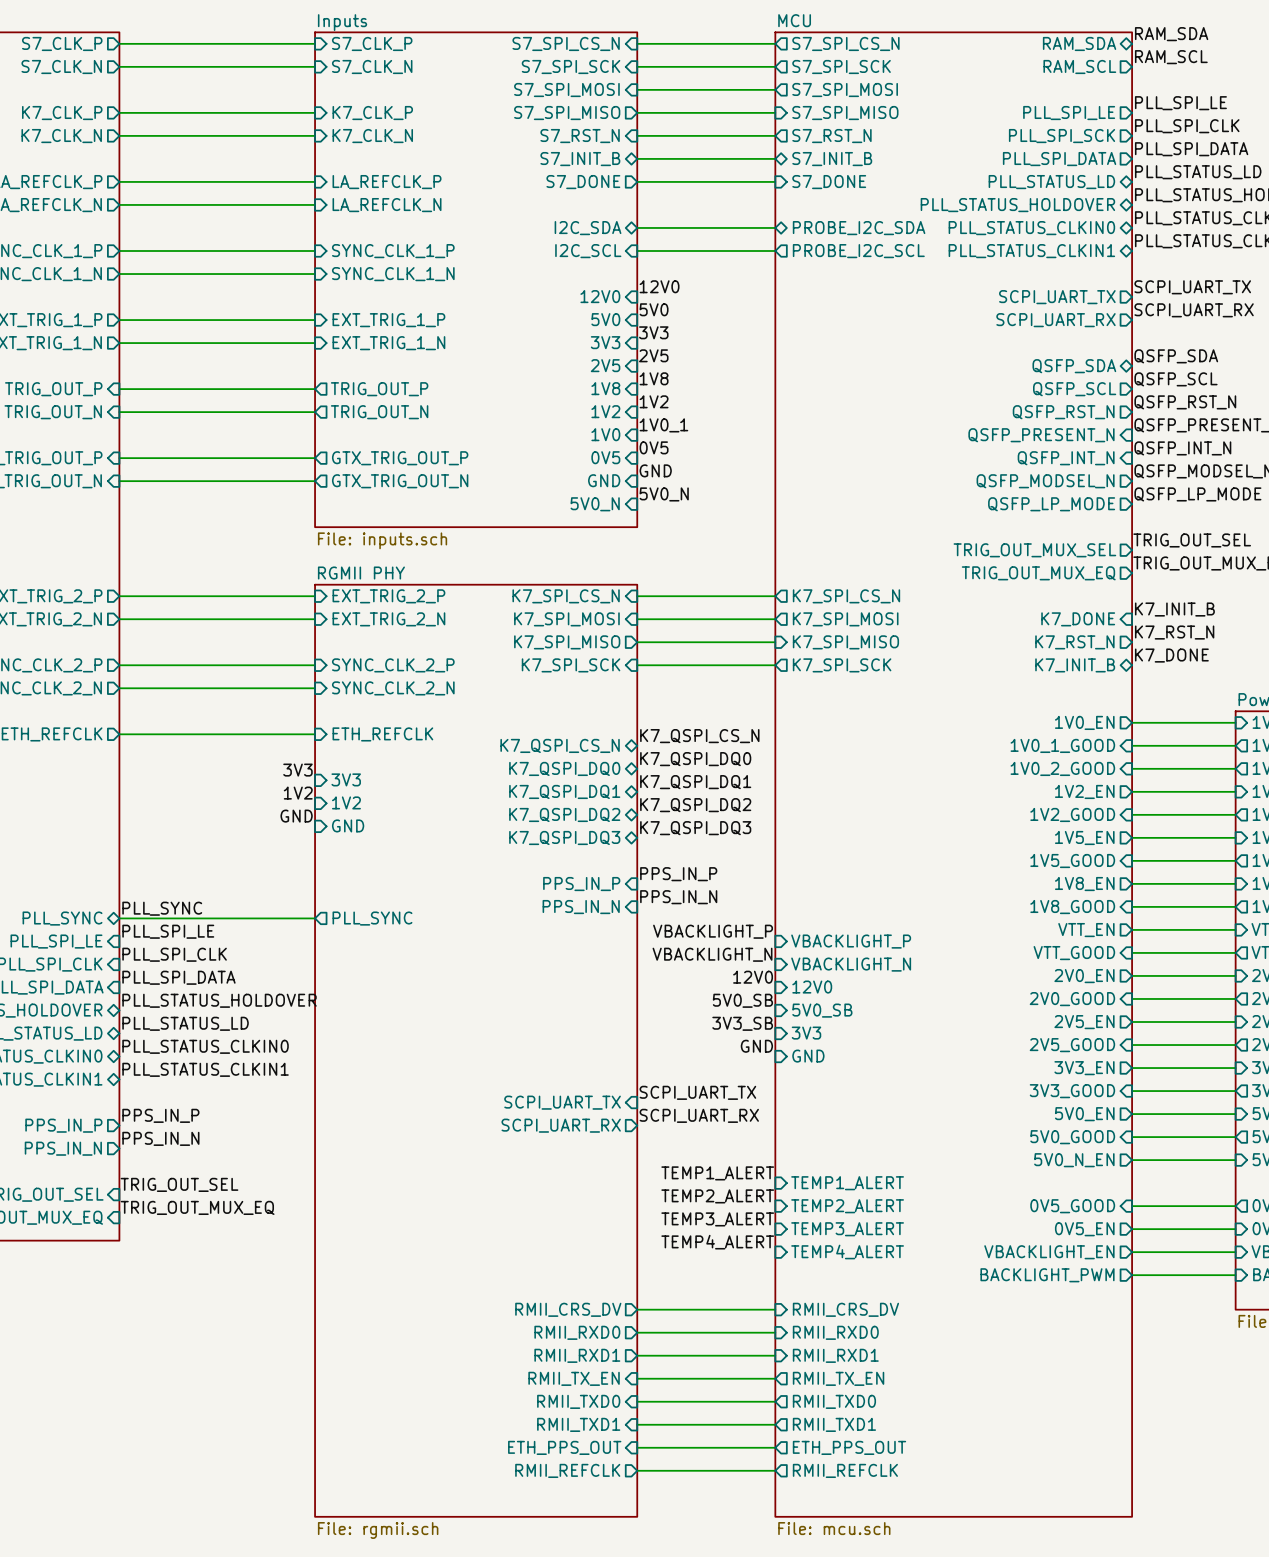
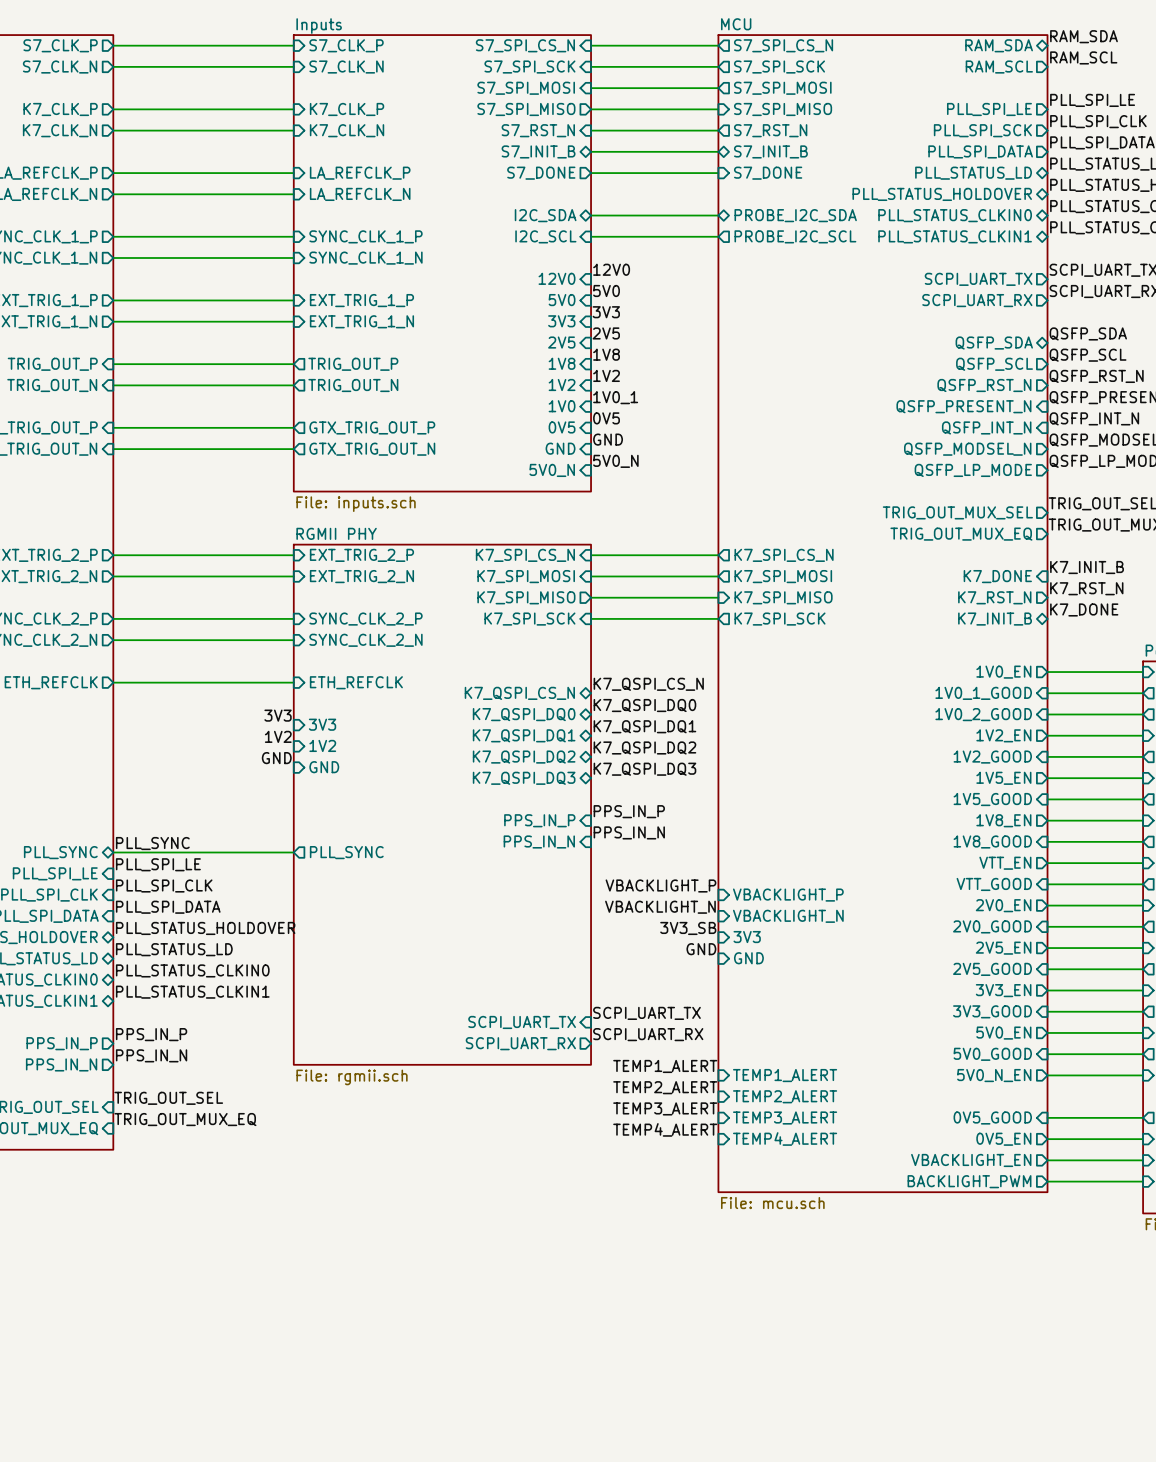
sheet MCU: none -> File: mcu.sch (882, 613)
sheet MCU: File: mcu.sch (953, 774) -> none
sheet RGMII PHY: none -> File: rgmii.sch (442, 804)
label: VBACKLIGHT_P (713, 931) -> none
sheet pin: VBACKLIGHT_P (851, 941) -> none
label: VBACKLIGHT_N (712, 954) -> VBACKLIGHT_P (660, 885)
sheet pin: VBACKLIGHT_N (851, 964) -> VBACKLIGHT_P (788, 895)
label: 12V0 (753, 977) -> VBACKLIGHT_N (660, 907)
sheet pin: 12V0 (812, 987) -> VBACKLIGHT_N (788, 916)
label: 5V0_SB (742, 1000) -> 3V3_SB (688, 928)
sheet pin: 5V0_SB (822, 1010) -> 3V3 (747, 937)
label: 3V3_SB (742, 1023) -> GND (701, 949)
sheet pin: 3V3 (806, 1033) -> GND (748, 958)
label: GND (756, 1046) -> none
sheet RGMII PHY: File: rgmii.sch (476, 1050) -> none
sheet pin: GND (808, 1056) -> none
label: none -> TEMP1_ALERT (665, 1066)
sheet pin: none -> TEMP1_ALERT (785, 1075)
label: TEMP1_ALERT (717, 1173) -> TEMP2_ALERT (665, 1087)
sheet pin: TEMP1_ALERT (847, 1183) -> TEMP2_ALERT (785, 1096)
label: TEMP2_ALERT (717, 1196) -> TEMP3_ALERT (665, 1108)
sheet pin: TEMP2_ALERT (847, 1206) -> TEMP3_ALERT (785, 1118)
label: TEMP3_ALERT (717, 1219) -> TEMP4_ALERT (665, 1129)
sheet pin: TEMP3_ALERT (847, 1229) -> TEMP4_ALERT (785, 1138)
label: TEMP4_ALERT (717, 1242) -> none
sheet pin: TEMP4_ALERT (847, 1251) -> none
sheet pin: RMII_CRS_DV (568, 1309) -> none
wire: (637, 1309) (775, 1309) -> none
sheet pin: RMII_CRS_DV (845, 1309) -> none
sheet pin: RMII_RXD0 (577, 1332) -> none
wire: (637, 1332) (775, 1332) -> none
sheet pin: RMII_RXD0 (835, 1332) -> none
sheet pin: RMII_RXD1 (577, 1355) -> none
wire: (637, 1355) (775, 1355) -> none
sheet pin: RMII_RXD1 (835, 1355) -> none
sheet pin: RMII_TX_EN (574, 1378) -> none
wire: (637, 1378) (775, 1378) -> none
sheet pin: RMII_TX_EN (838, 1378) -> none
sheet pin: RMII_TXD0 (578, 1401) -> none
wire: (637, 1401) (775, 1401) -> none
sheet pin: RMII_TXD0 (834, 1401) -> none
sheet pin: RMII_TXD1 (578, 1424) -> none
wire: (637, 1424) (775, 1424) -> none
sheet pin: RMII_TXD1 (834, 1424) -> none
sheet pin: ETH_PPS_OUT (564, 1447) -> none
wire: (637, 1447) (775, 1447) -> none
sheet pin: ETH_PPS_OUT (849, 1447) -> none
sheet pin: RMII_REFCLK (567, 1470) -> none
wire: (637, 1470) (775, 1470) -> none
sheet pin: RMII_REFCLK (845, 1470) -> none

